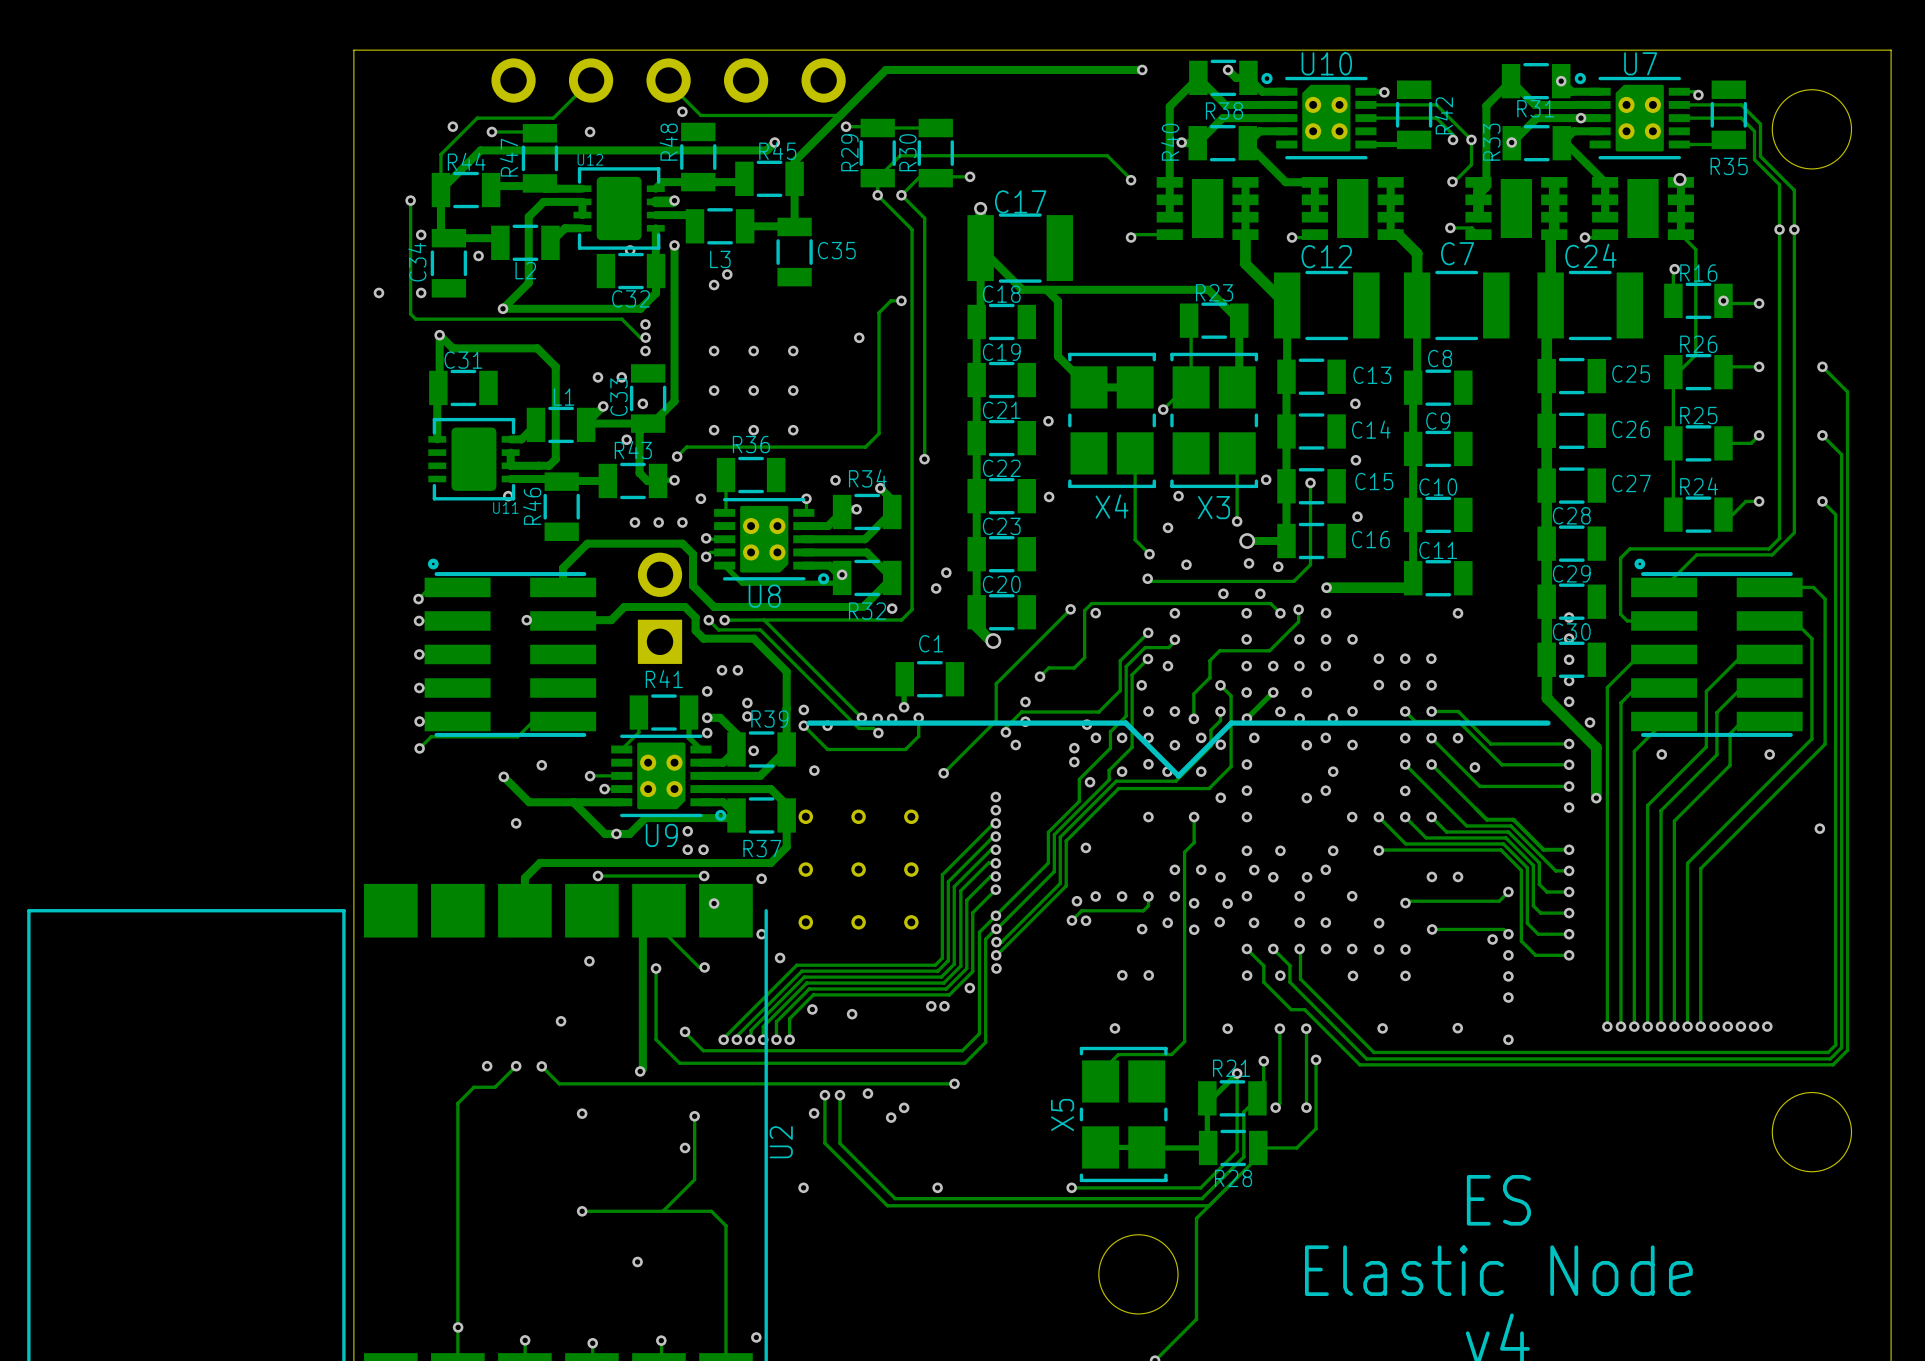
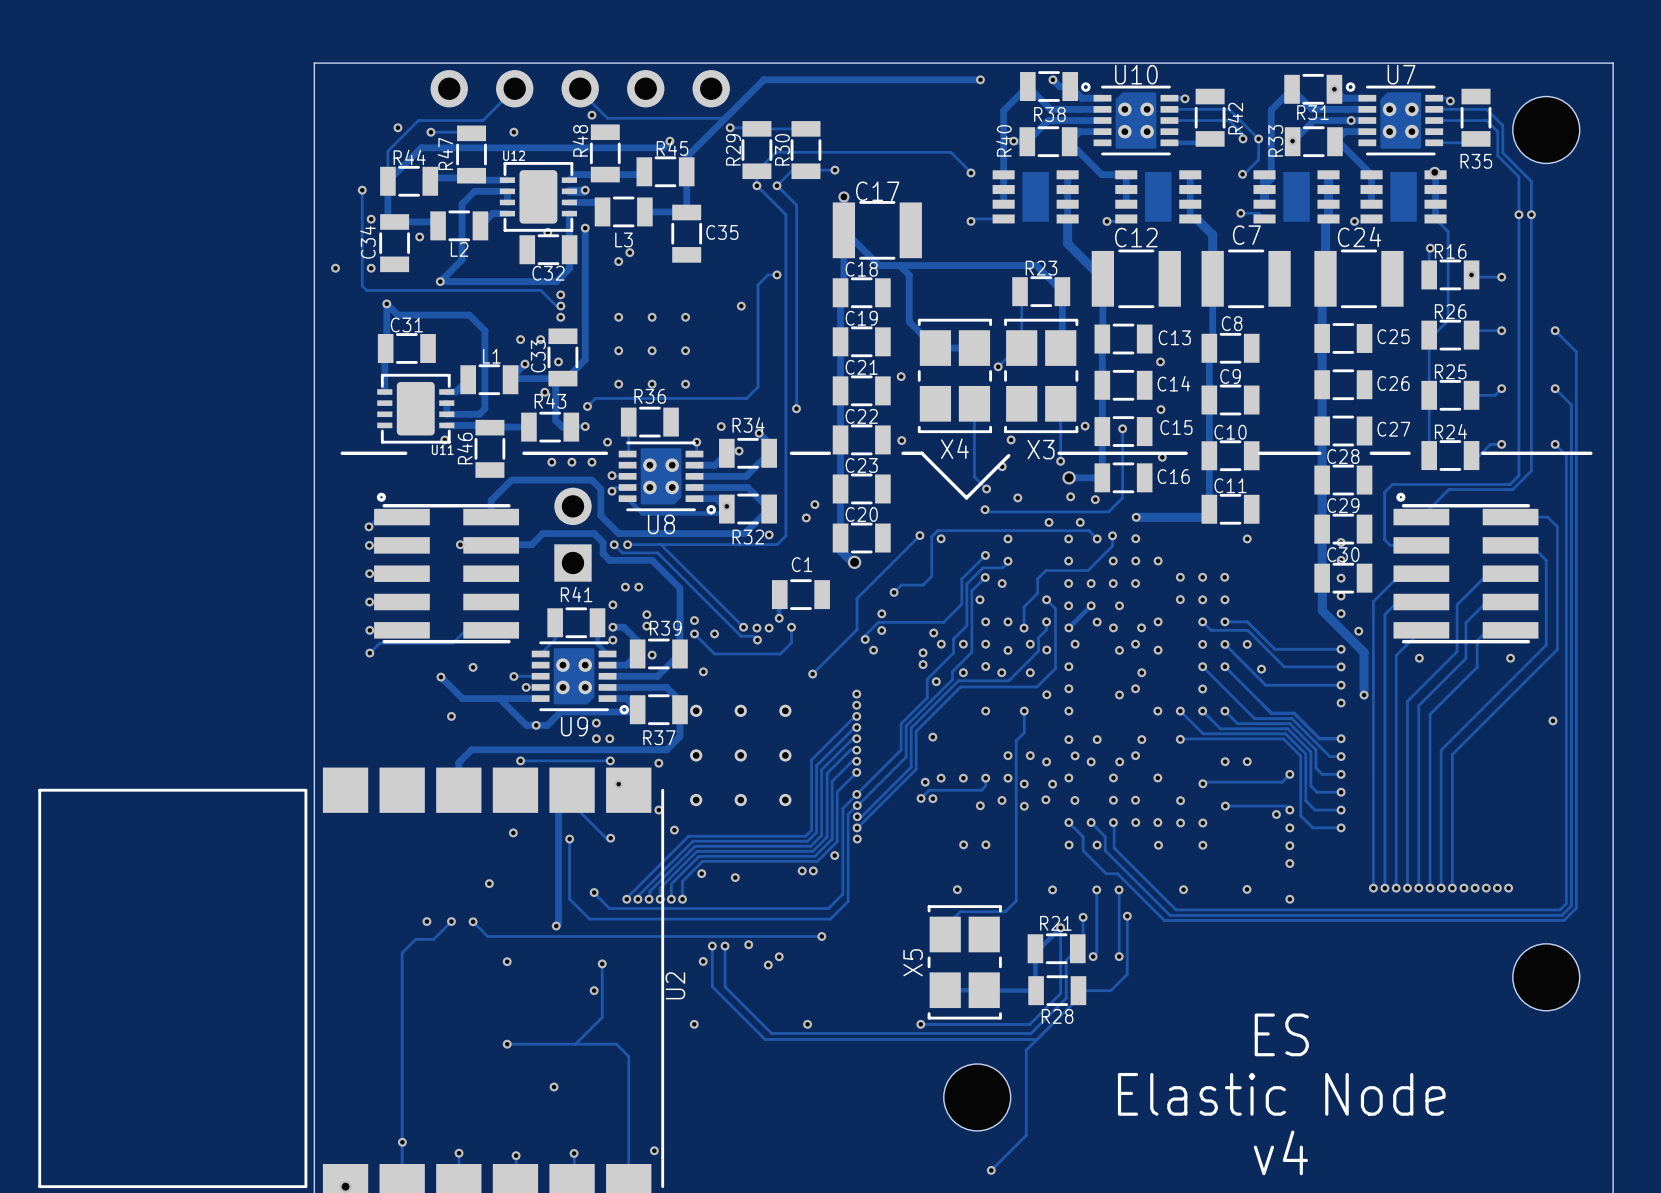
line: none -> (405, 453) (342, 453)
line: none -> (606, 453) (523, 453)
line: none -> (829, 453) (791, 453)
line: none -> (903, 453) (921, 453) (966, 497) (1008, 455)
line: none -> (1186, 453) (1059, 453)
line: none -> (1319, 453) (1259, 453)
line: none -> (1409, 453) (1371, 453)
line: none -> (1590, 453) (1482, 453)
line: (1548, 723) (1231, 723) (1178, 775) (1125, 723) (809, 723) -> none

